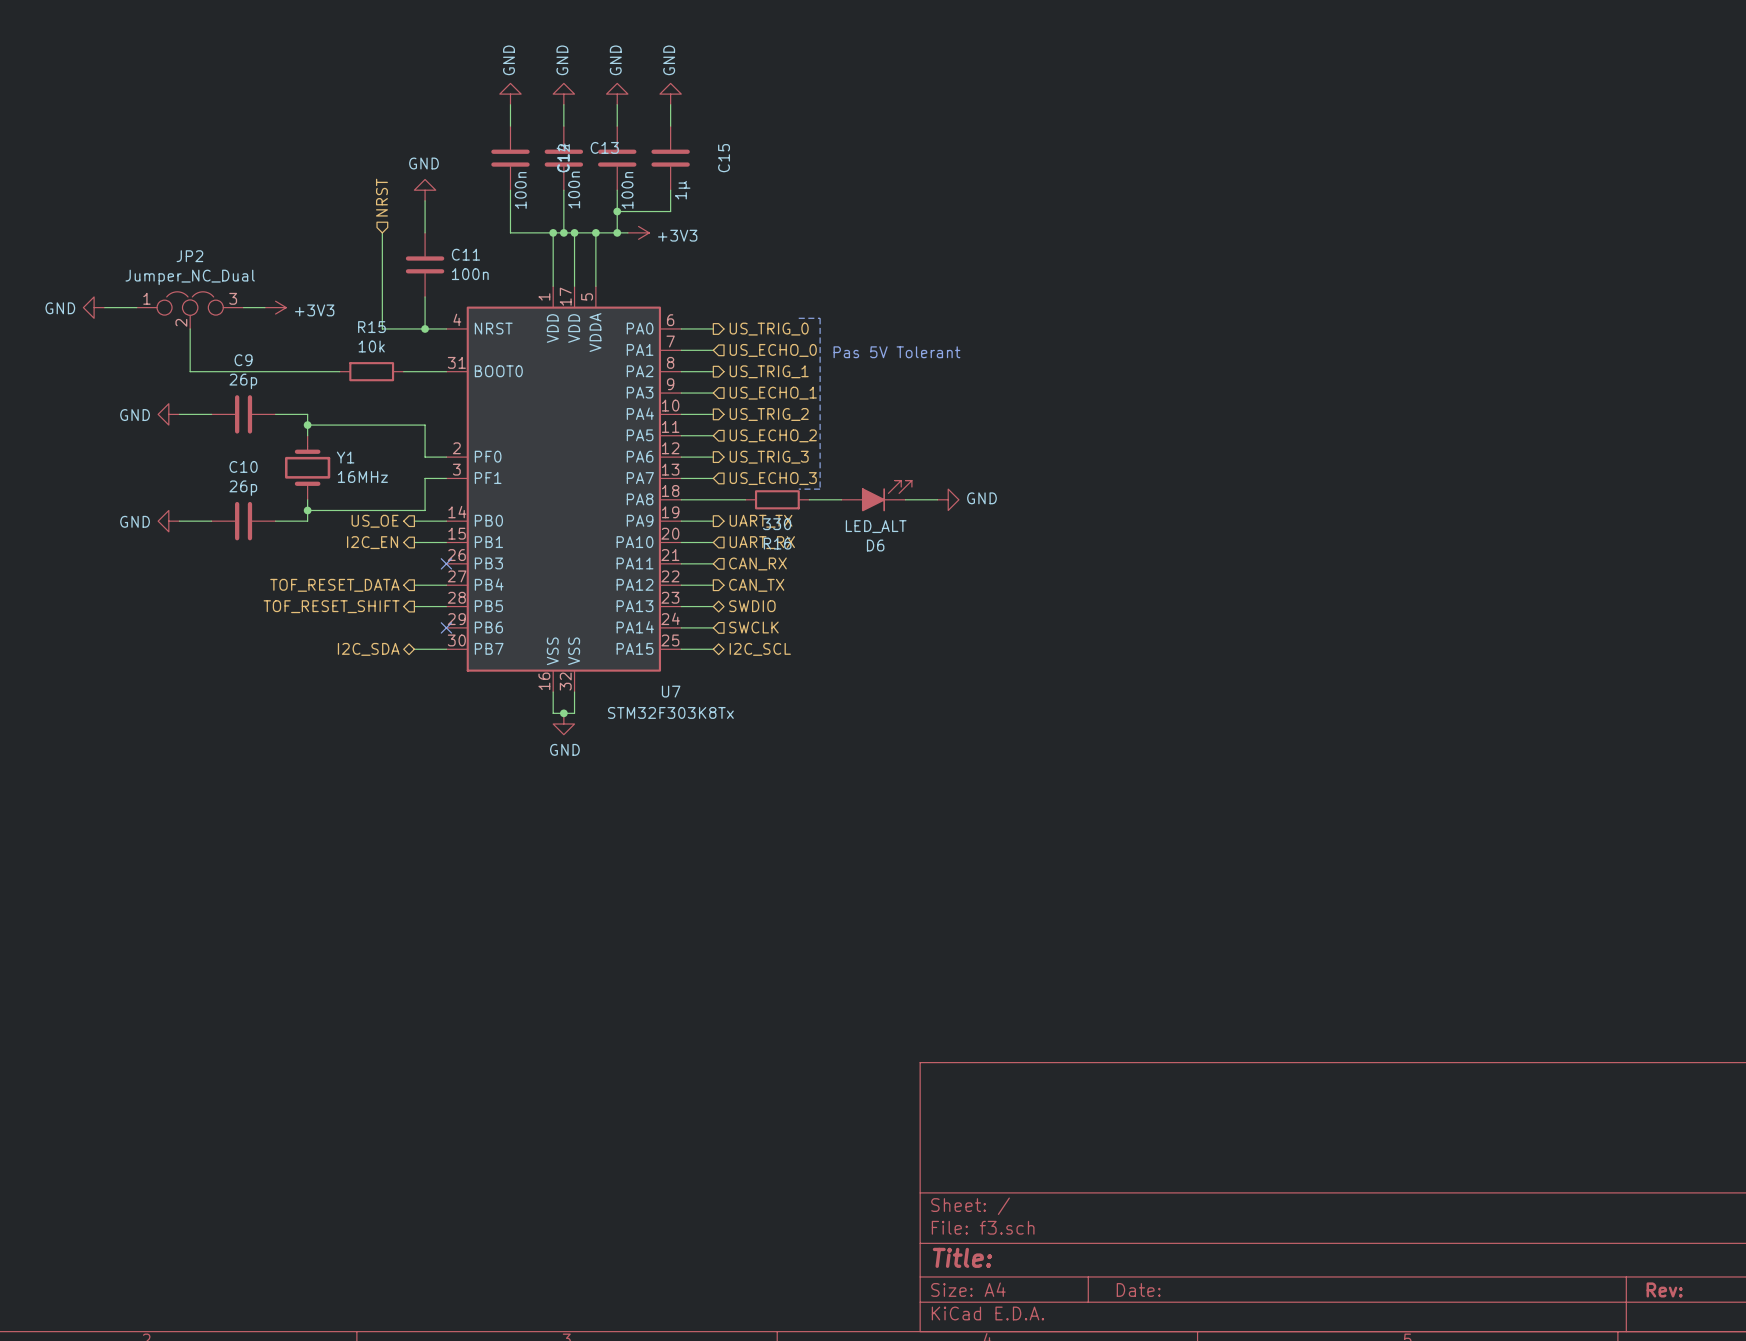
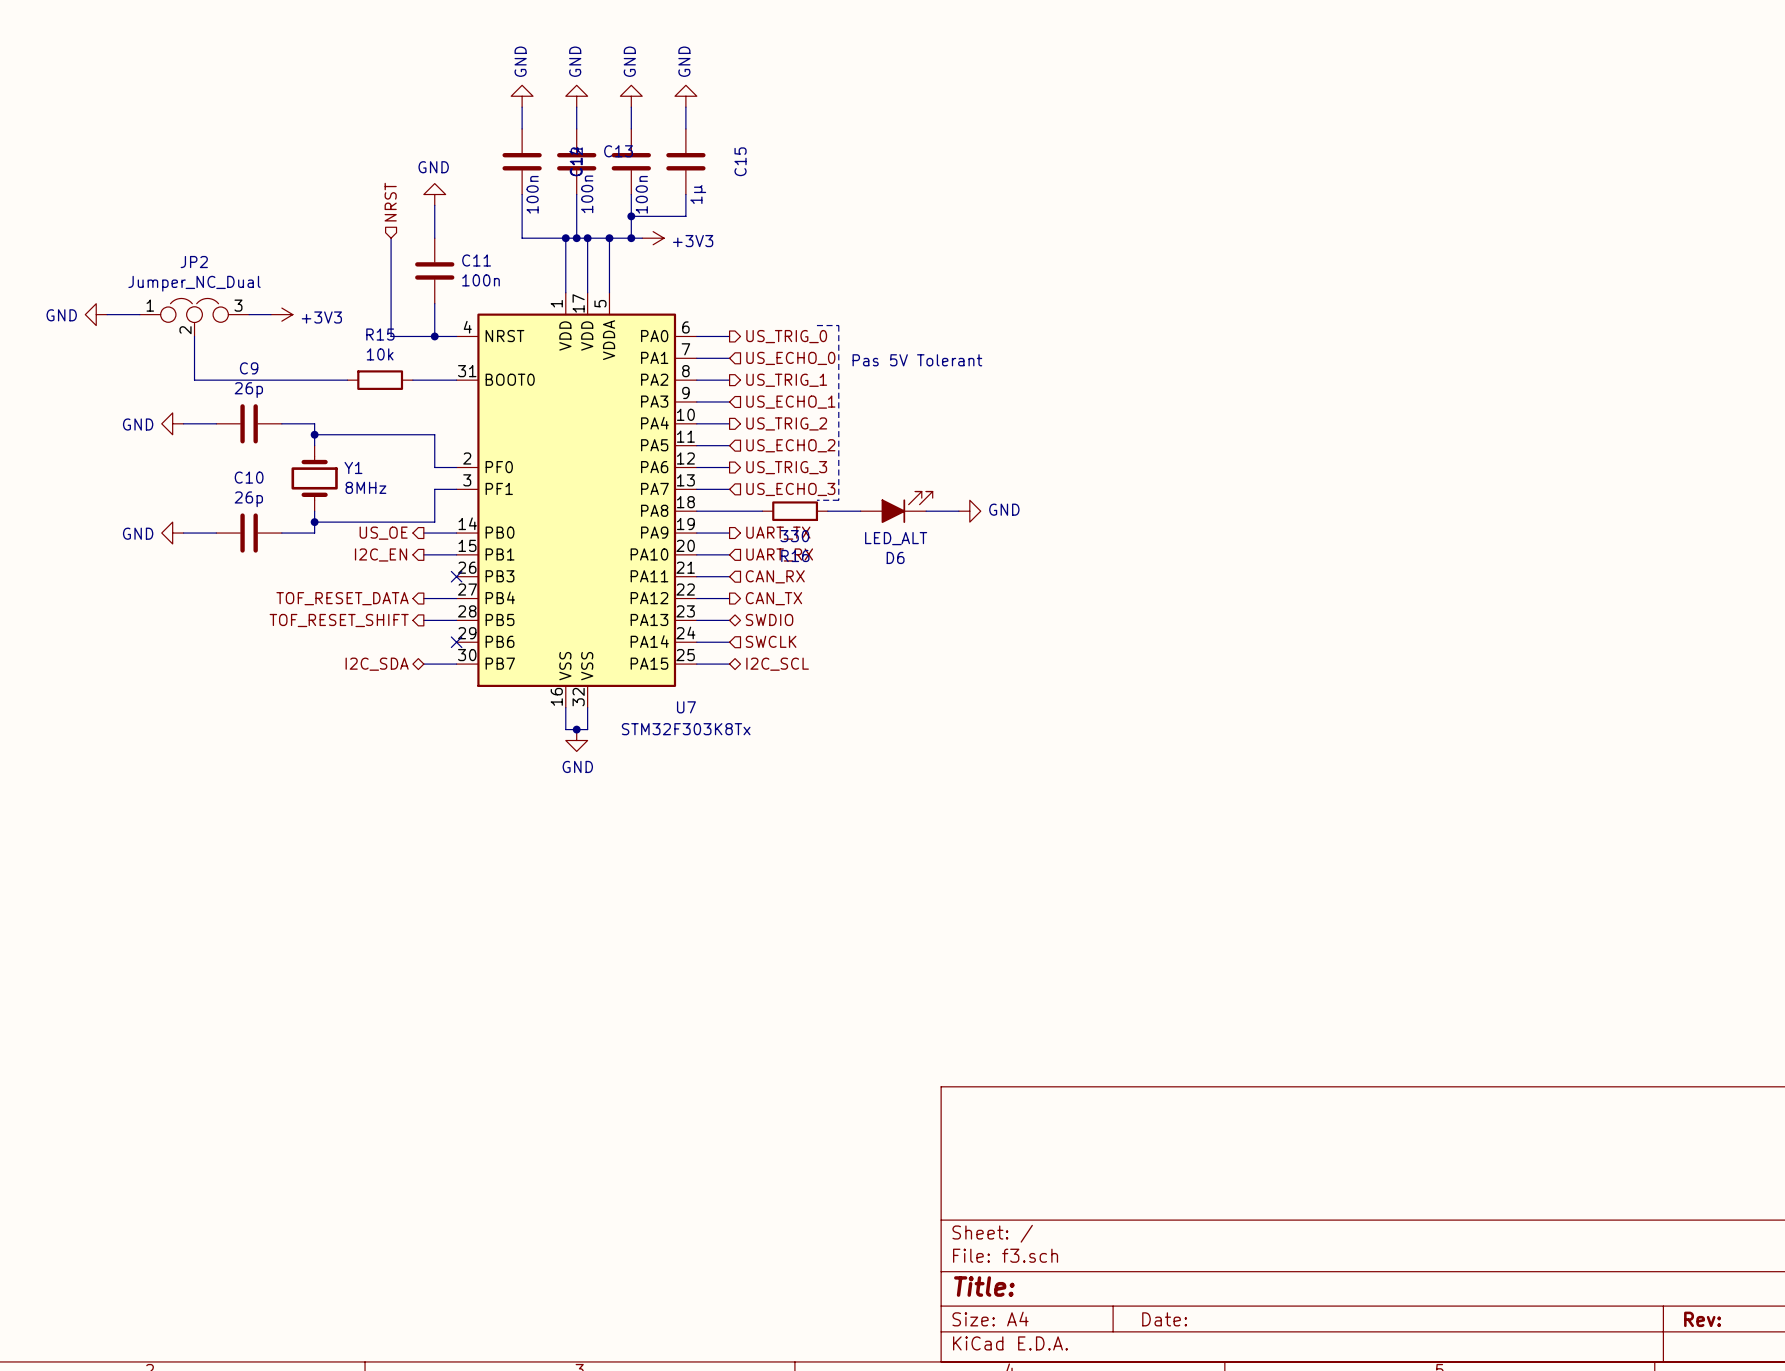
Y1 value: 16MHz (362, 476) -> 8MHz (365, 487)

